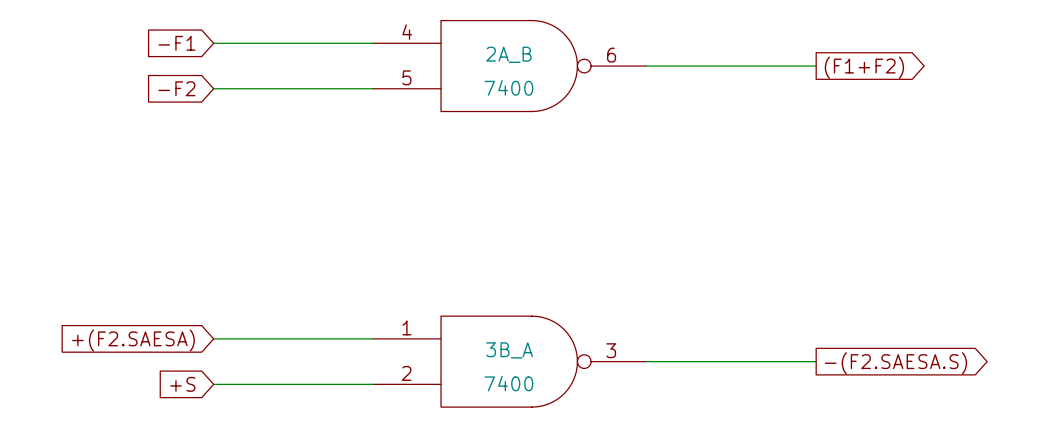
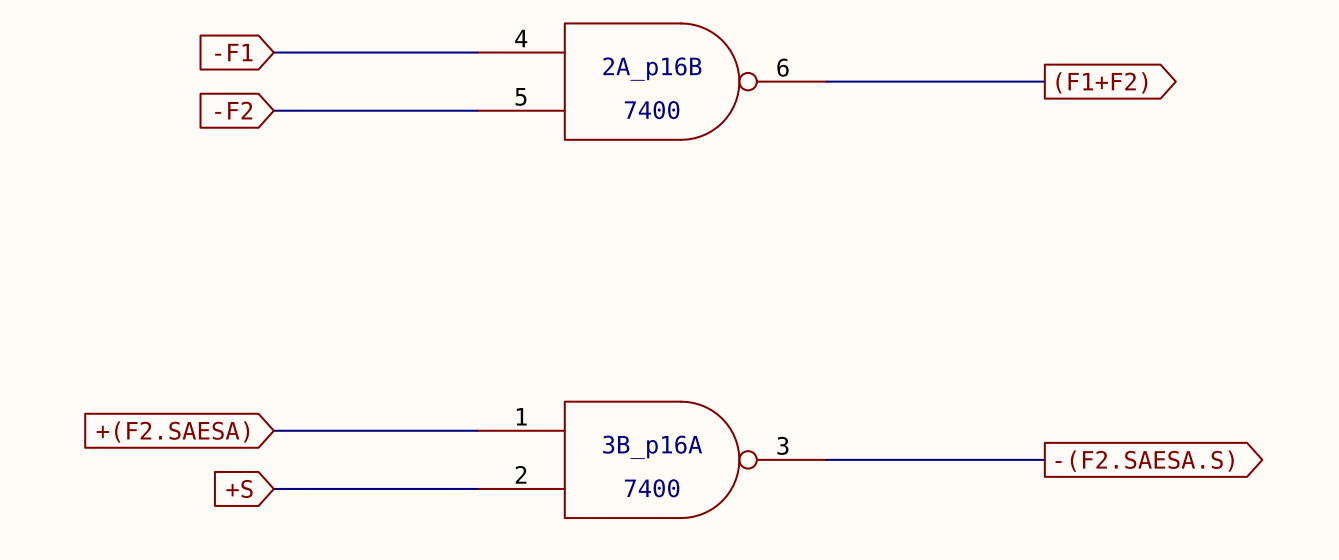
2A_B name: 2A_B (508, 54) -> 2A_p16B (652, 69)
3B_A name: 3B_A (509, 350) -> 3B_p16A (652, 447)

